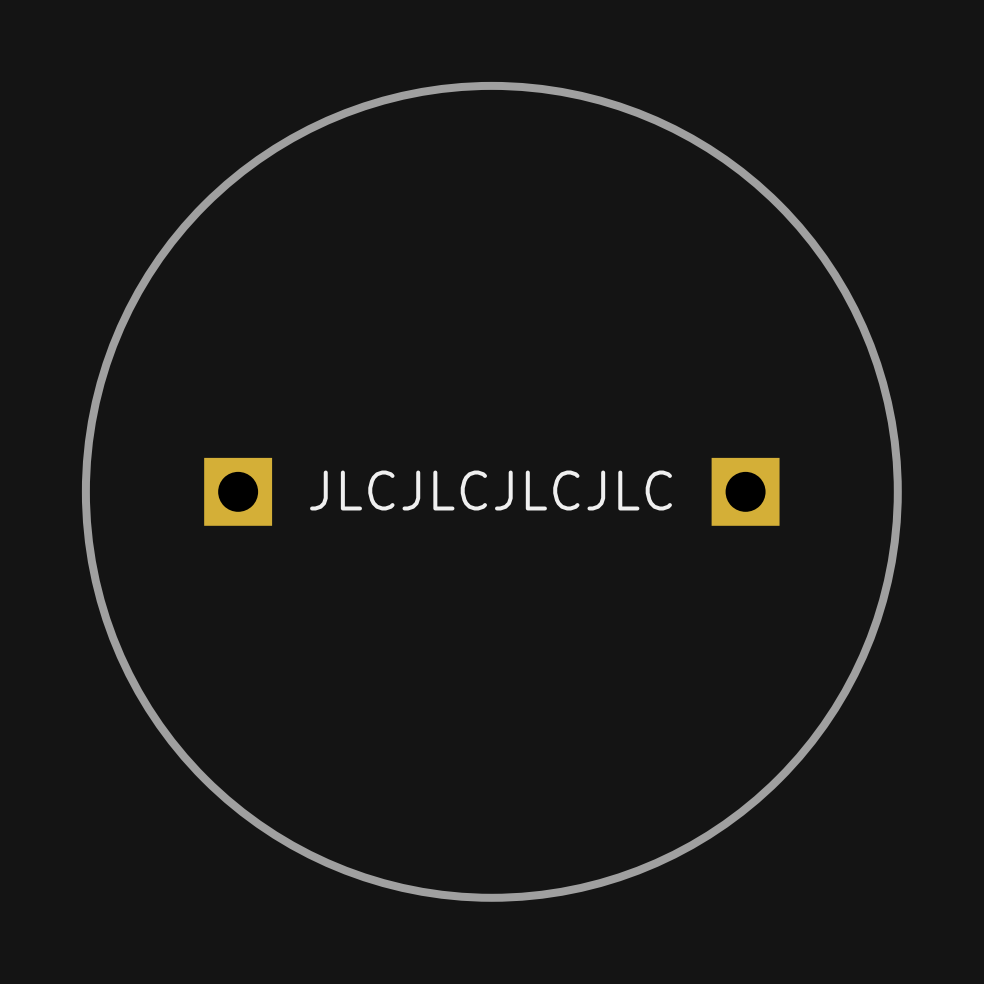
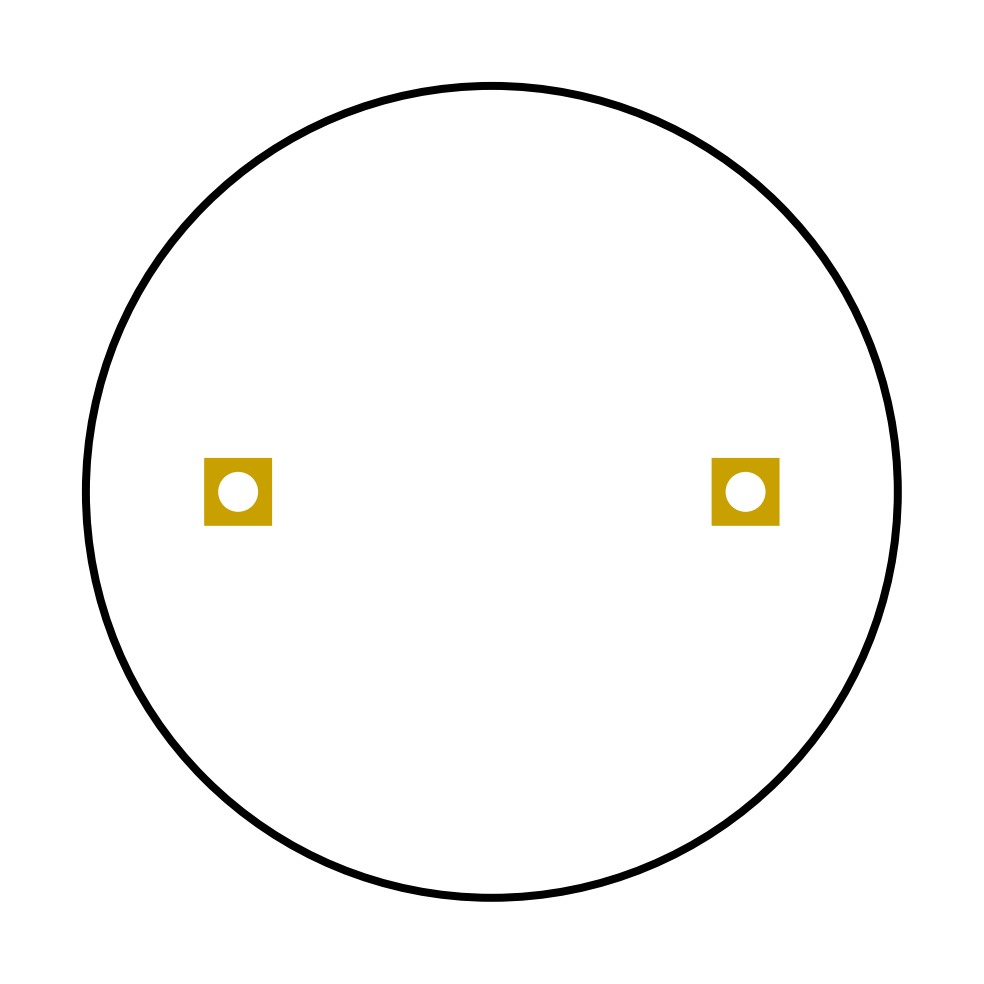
text: JLCJLCJLCJLC (490, 490) -> none

